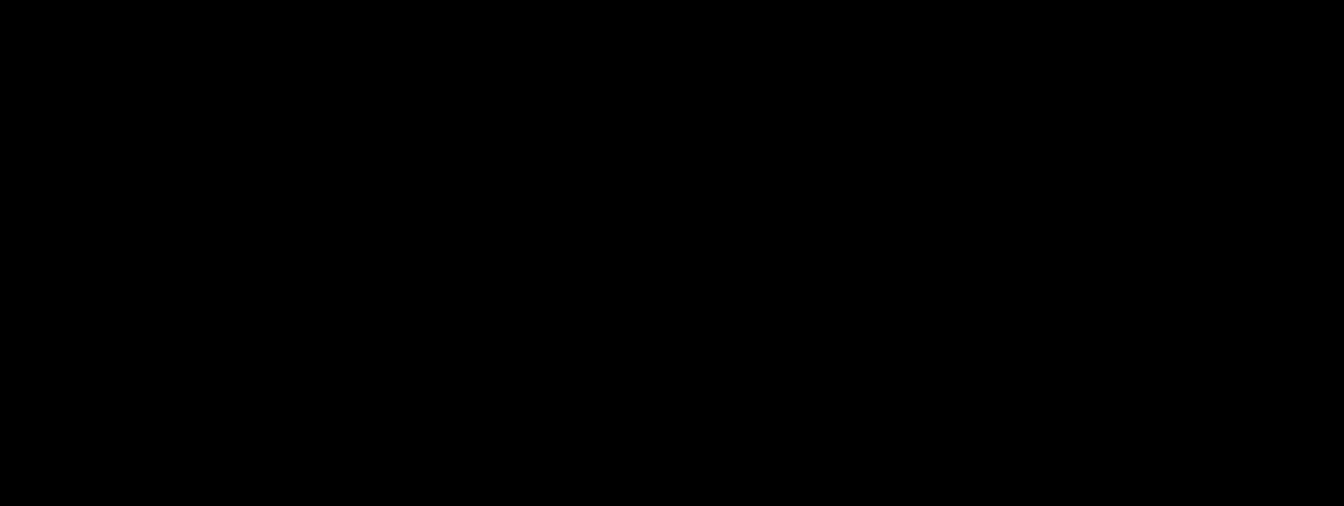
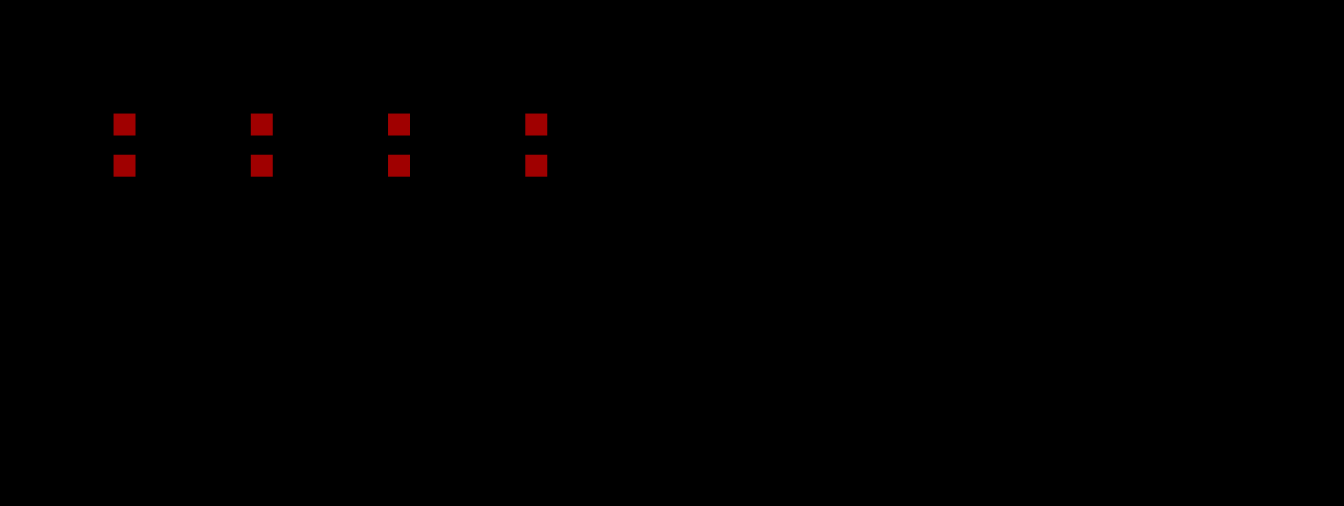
part: none -> (124, 145)
part: none -> (261, 145)
part: none -> (399, 145)
part: none -> (536, 145)

